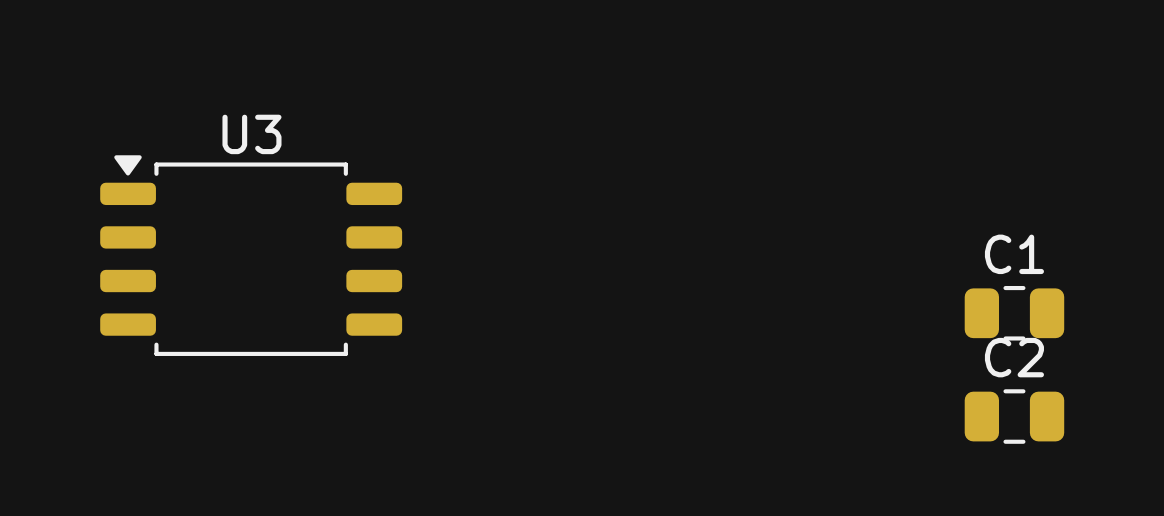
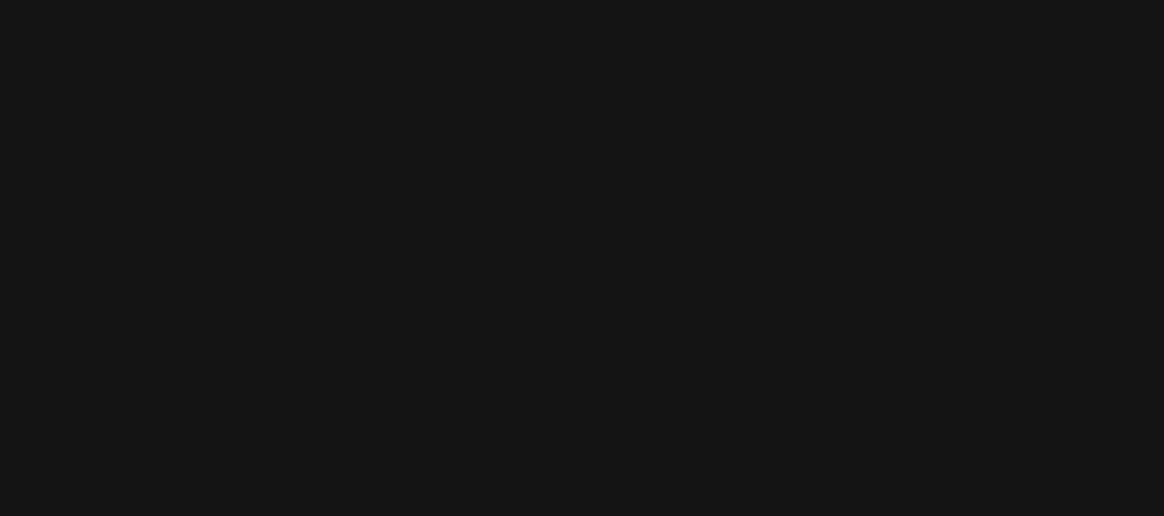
U3: (251, 255) -> none
C1: (1014, 313) -> none
C2: (1014, 416) -> none

